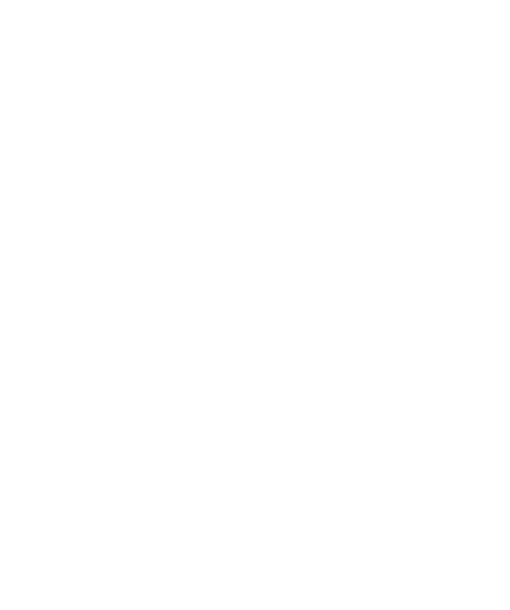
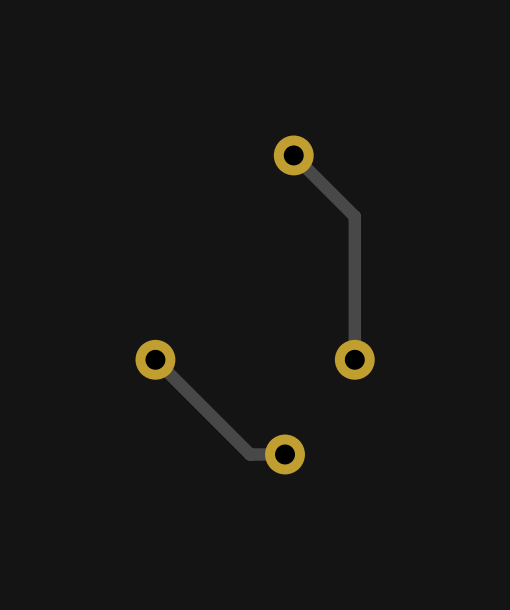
track: none -> (293, 155) (354, 216) (354, 359)
via: none -> (293, 155)
track: none -> (155, 359) (250, 454) (285, 454)
via: none -> (155, 359)
via: none -> (354, 359)
via: none -> (285, 454)

